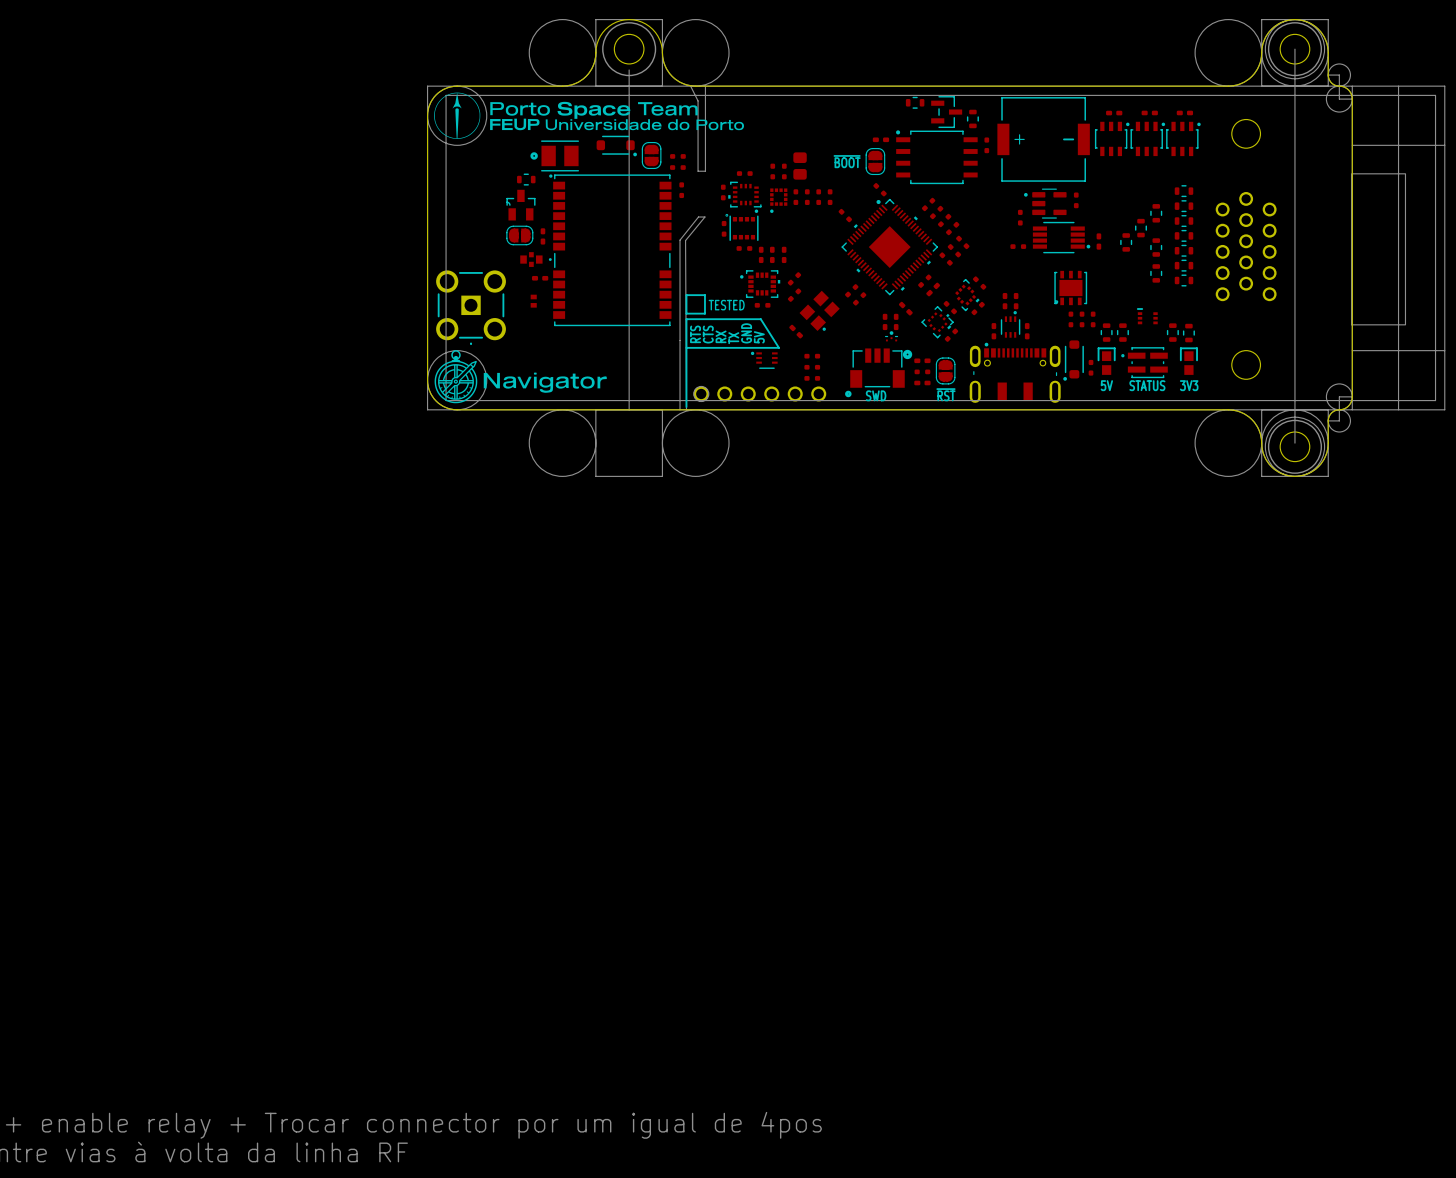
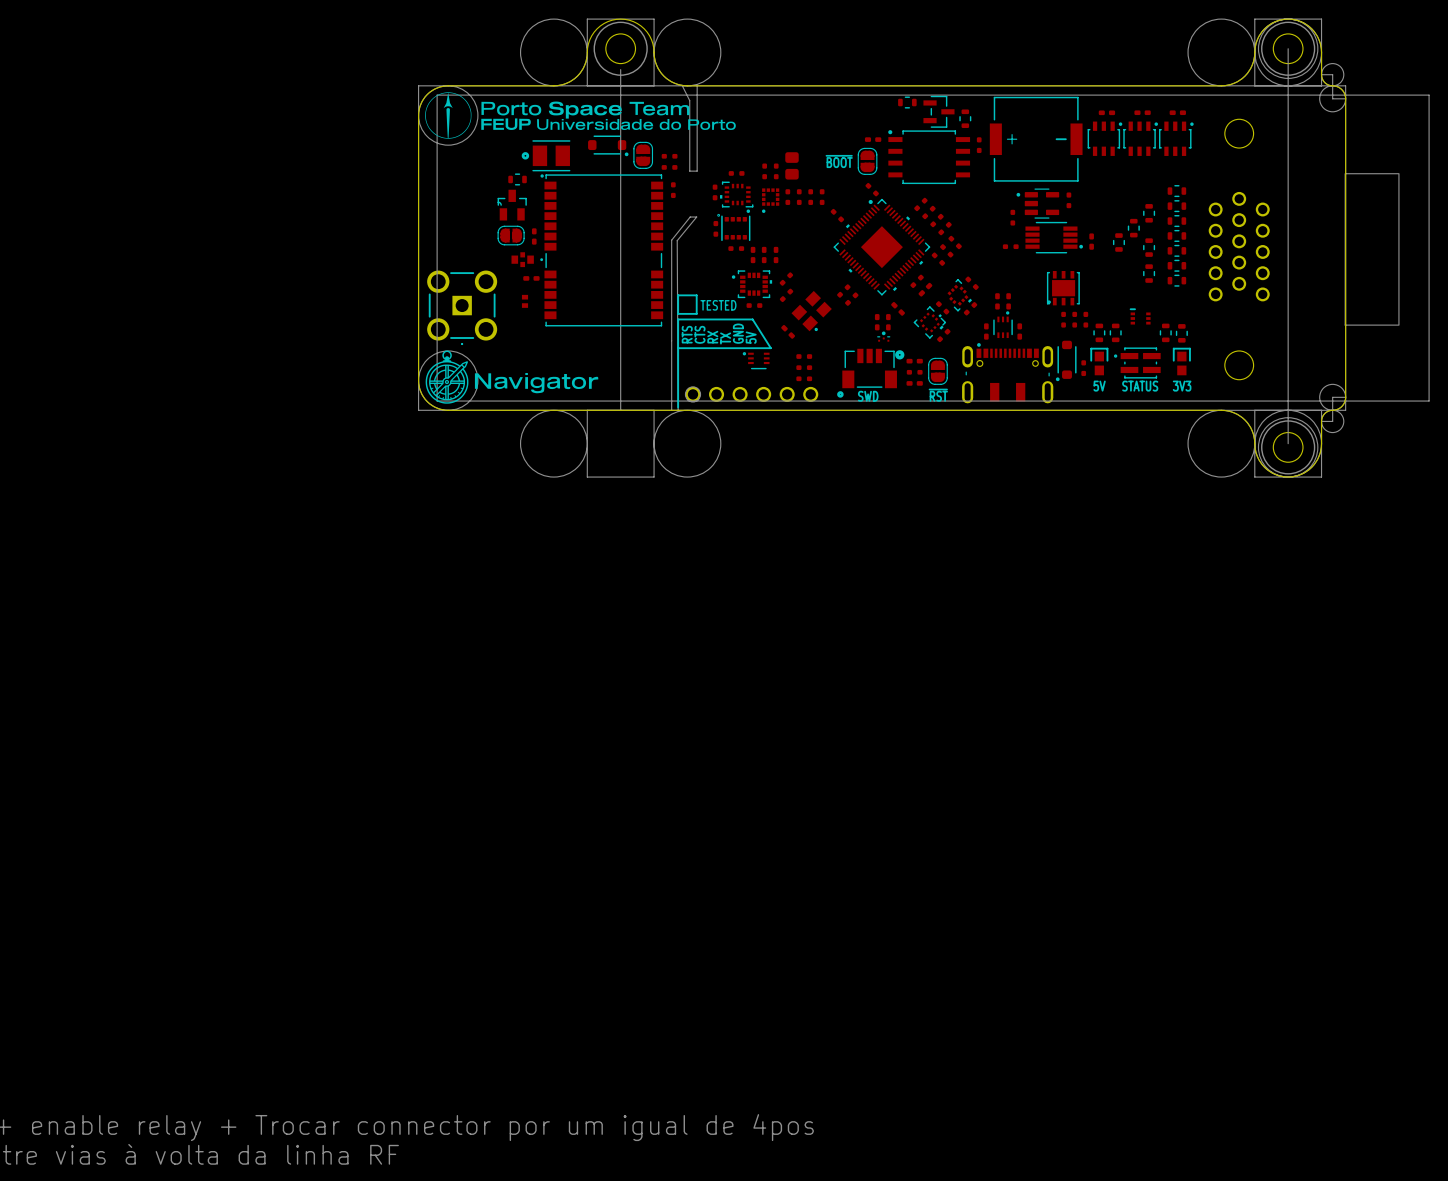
line: (1352, 86) (1444, 86) (1444, 409) (1352, 409) -> none
line: (1398, 86) (1398, 409) -> none
line: (1352, 145) (1444, 145) -> none
line: (1352, 350) (1444, 350) -> none

